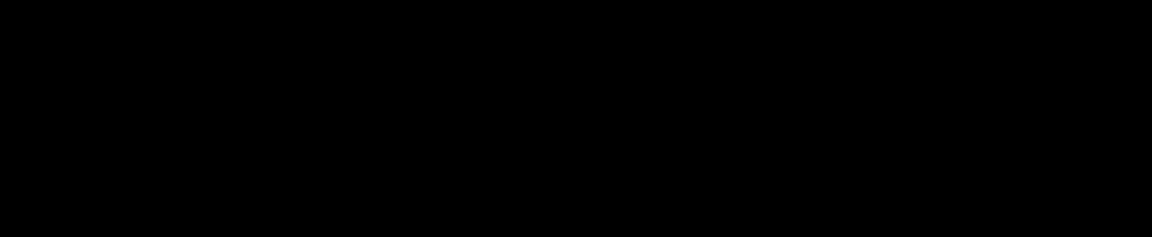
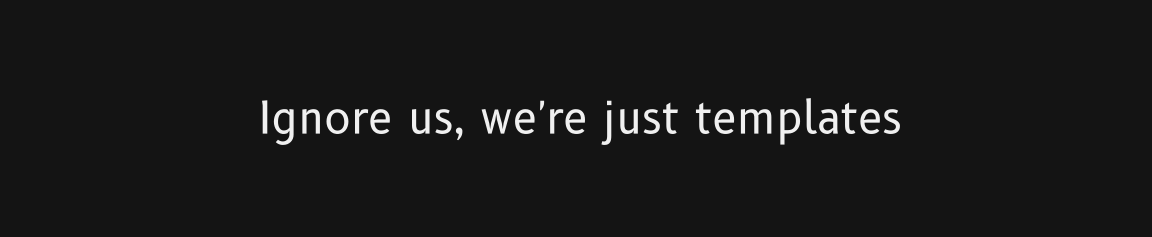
text: none -> Ignore us, we're just templates (580, 121)

